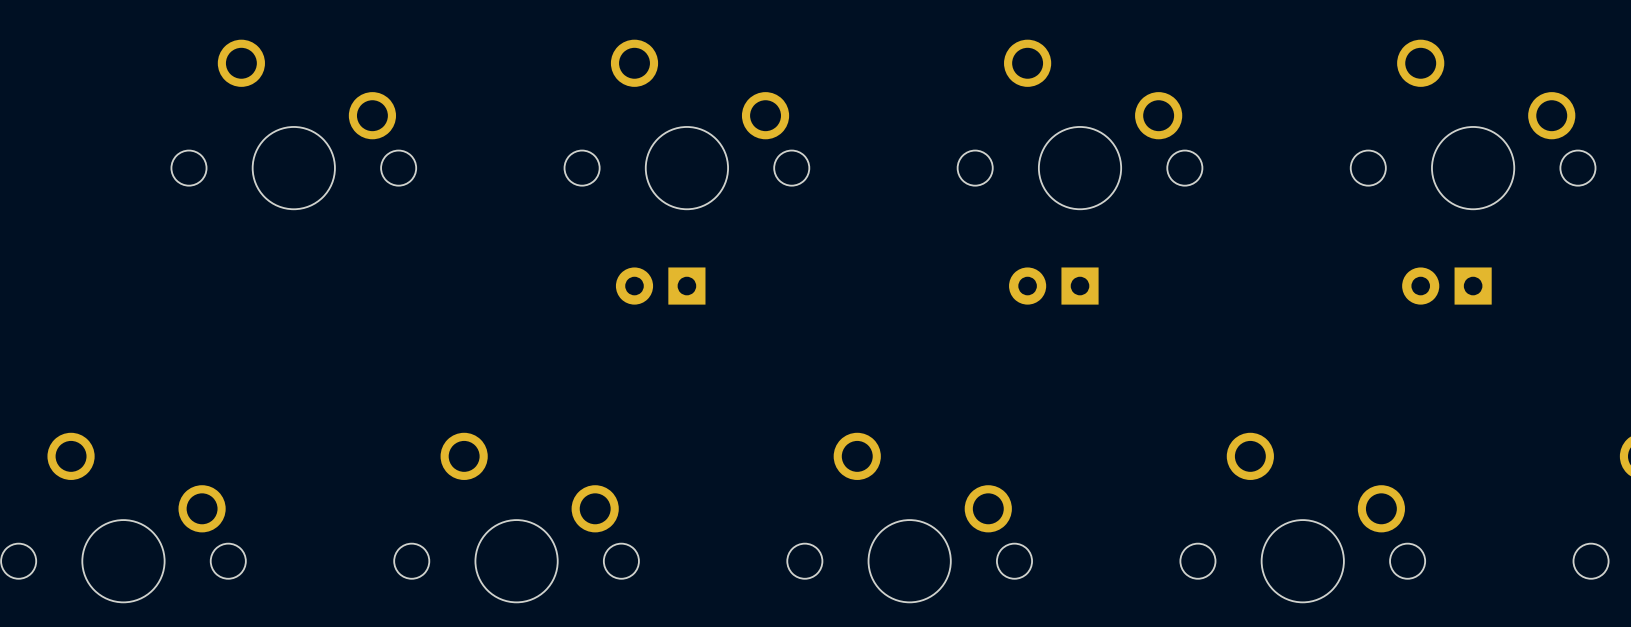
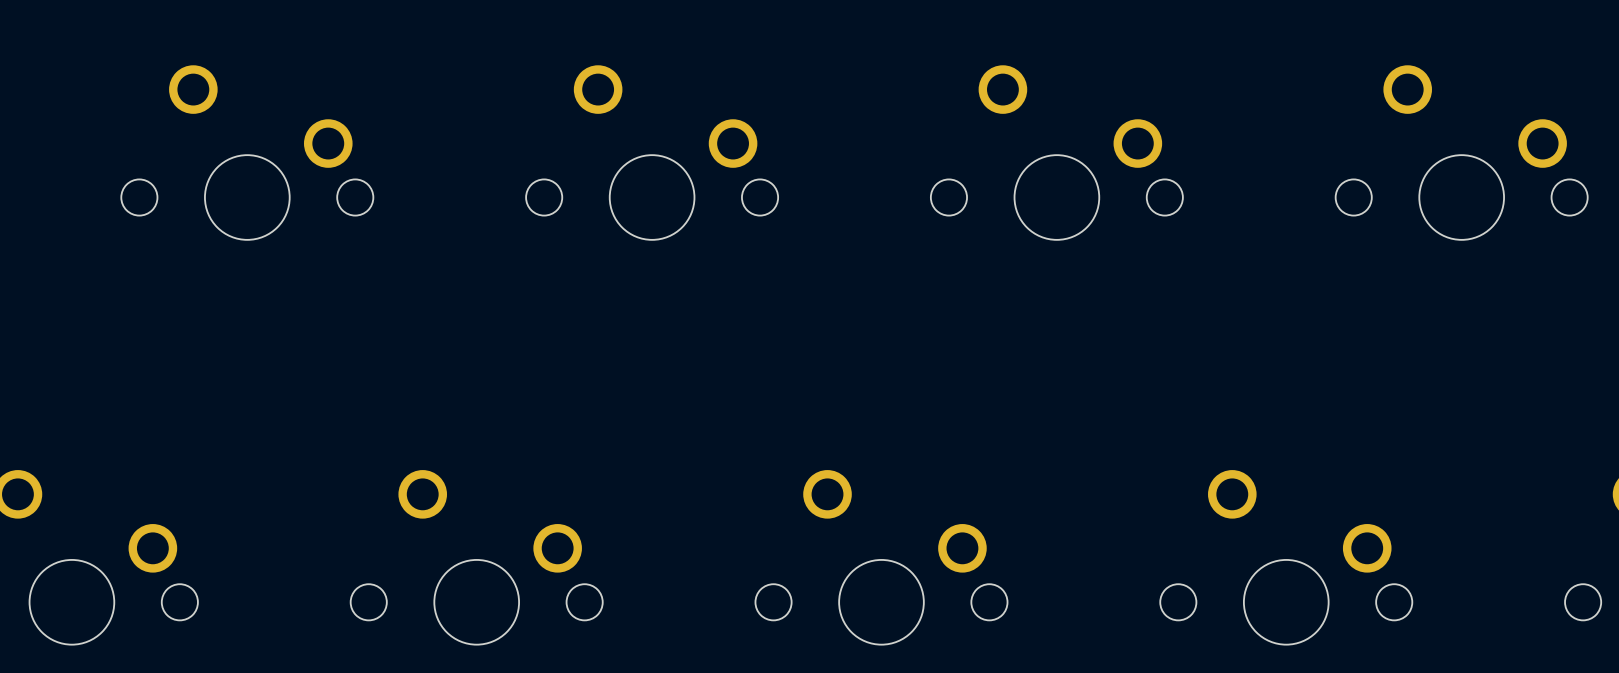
part: (660, 286) -> none
part: (1053, 286) -> none
part: (1446, 286) -> none

